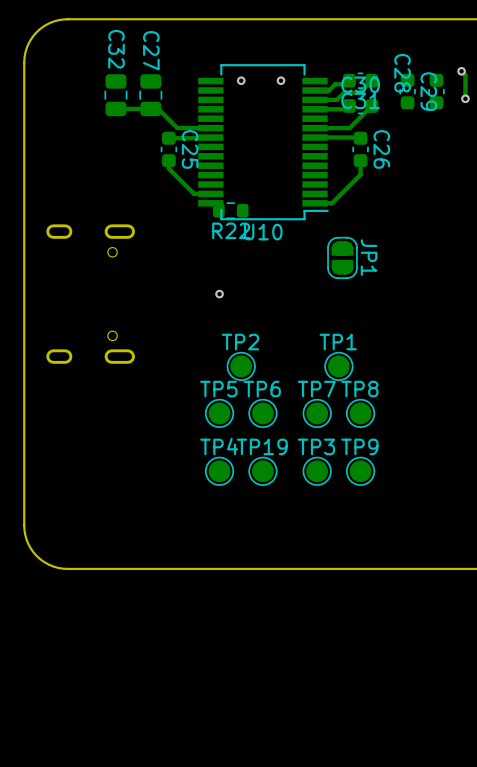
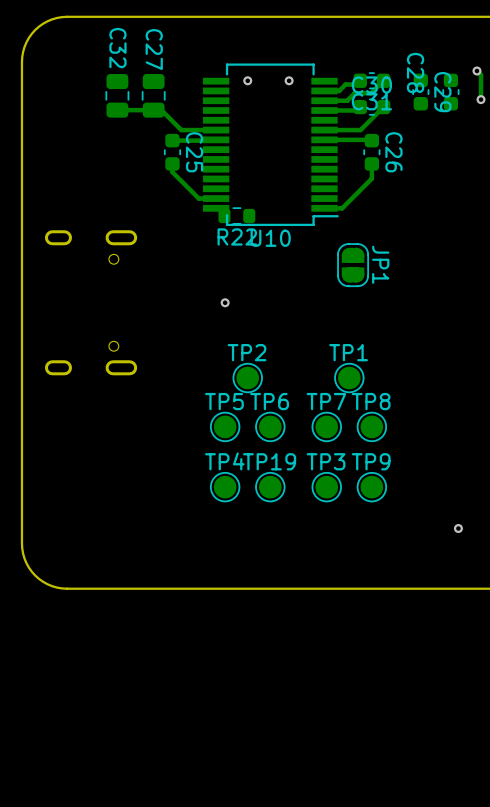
via: none -> (458, 528)

